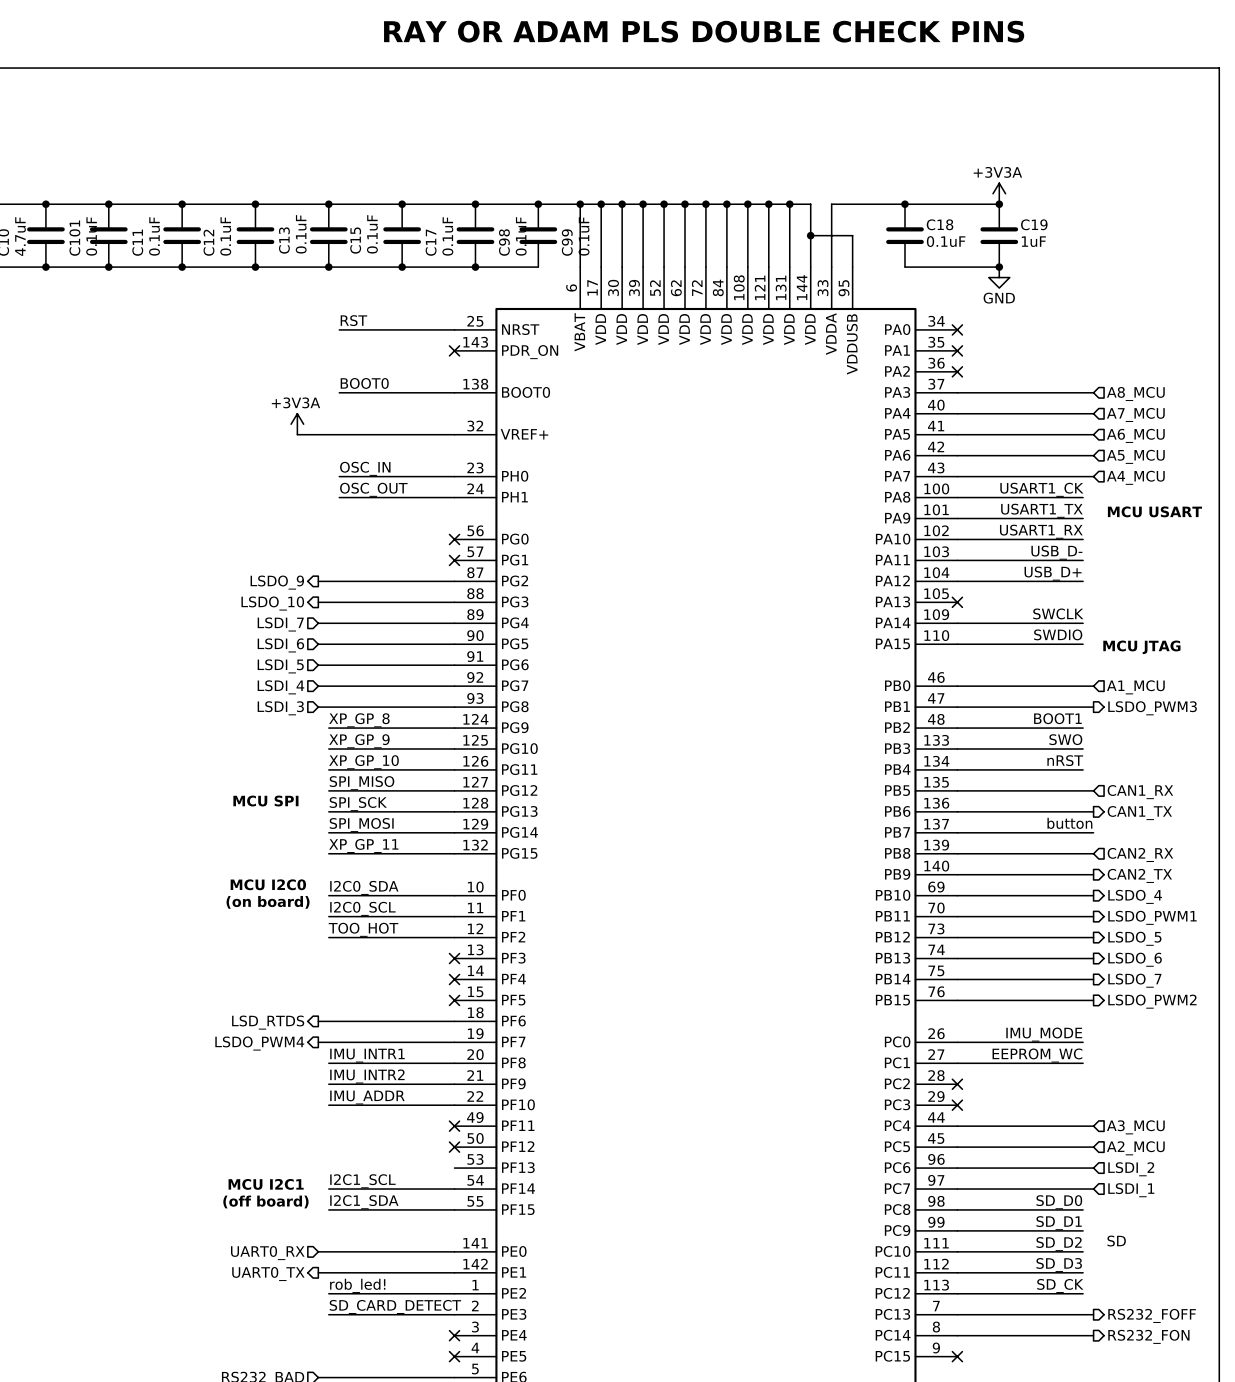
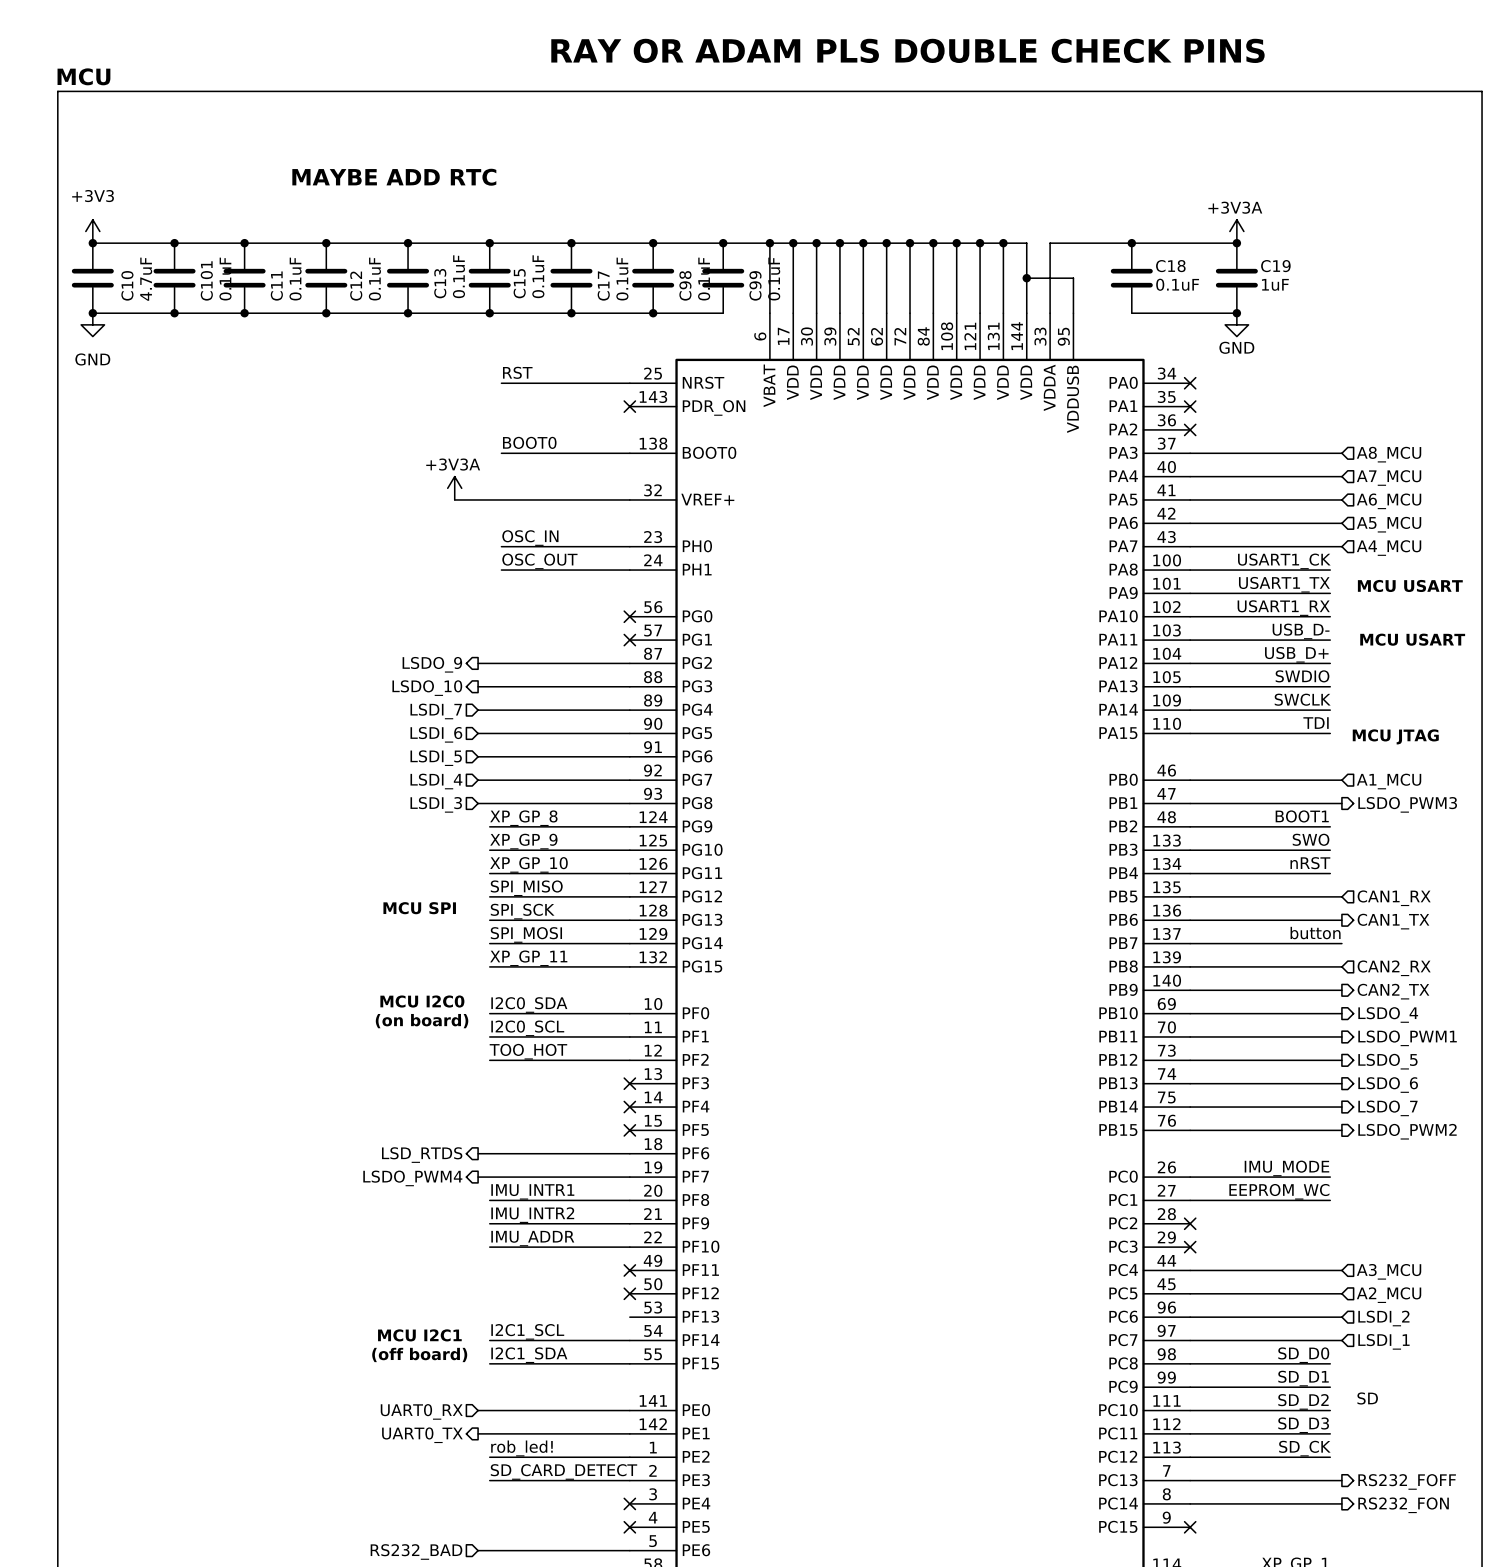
text: none -> MAYBE ADD RTC (394, 177)
text: none -> MCU USART (1412, 639)
label: none -> SWDIO (1302, 676)
wire: none -> (1190, 686) (1330, 686)
no-connect mark: (957, 602) -> none
label: SWDIO (1058, 634) -> TDI (1316, 723)

